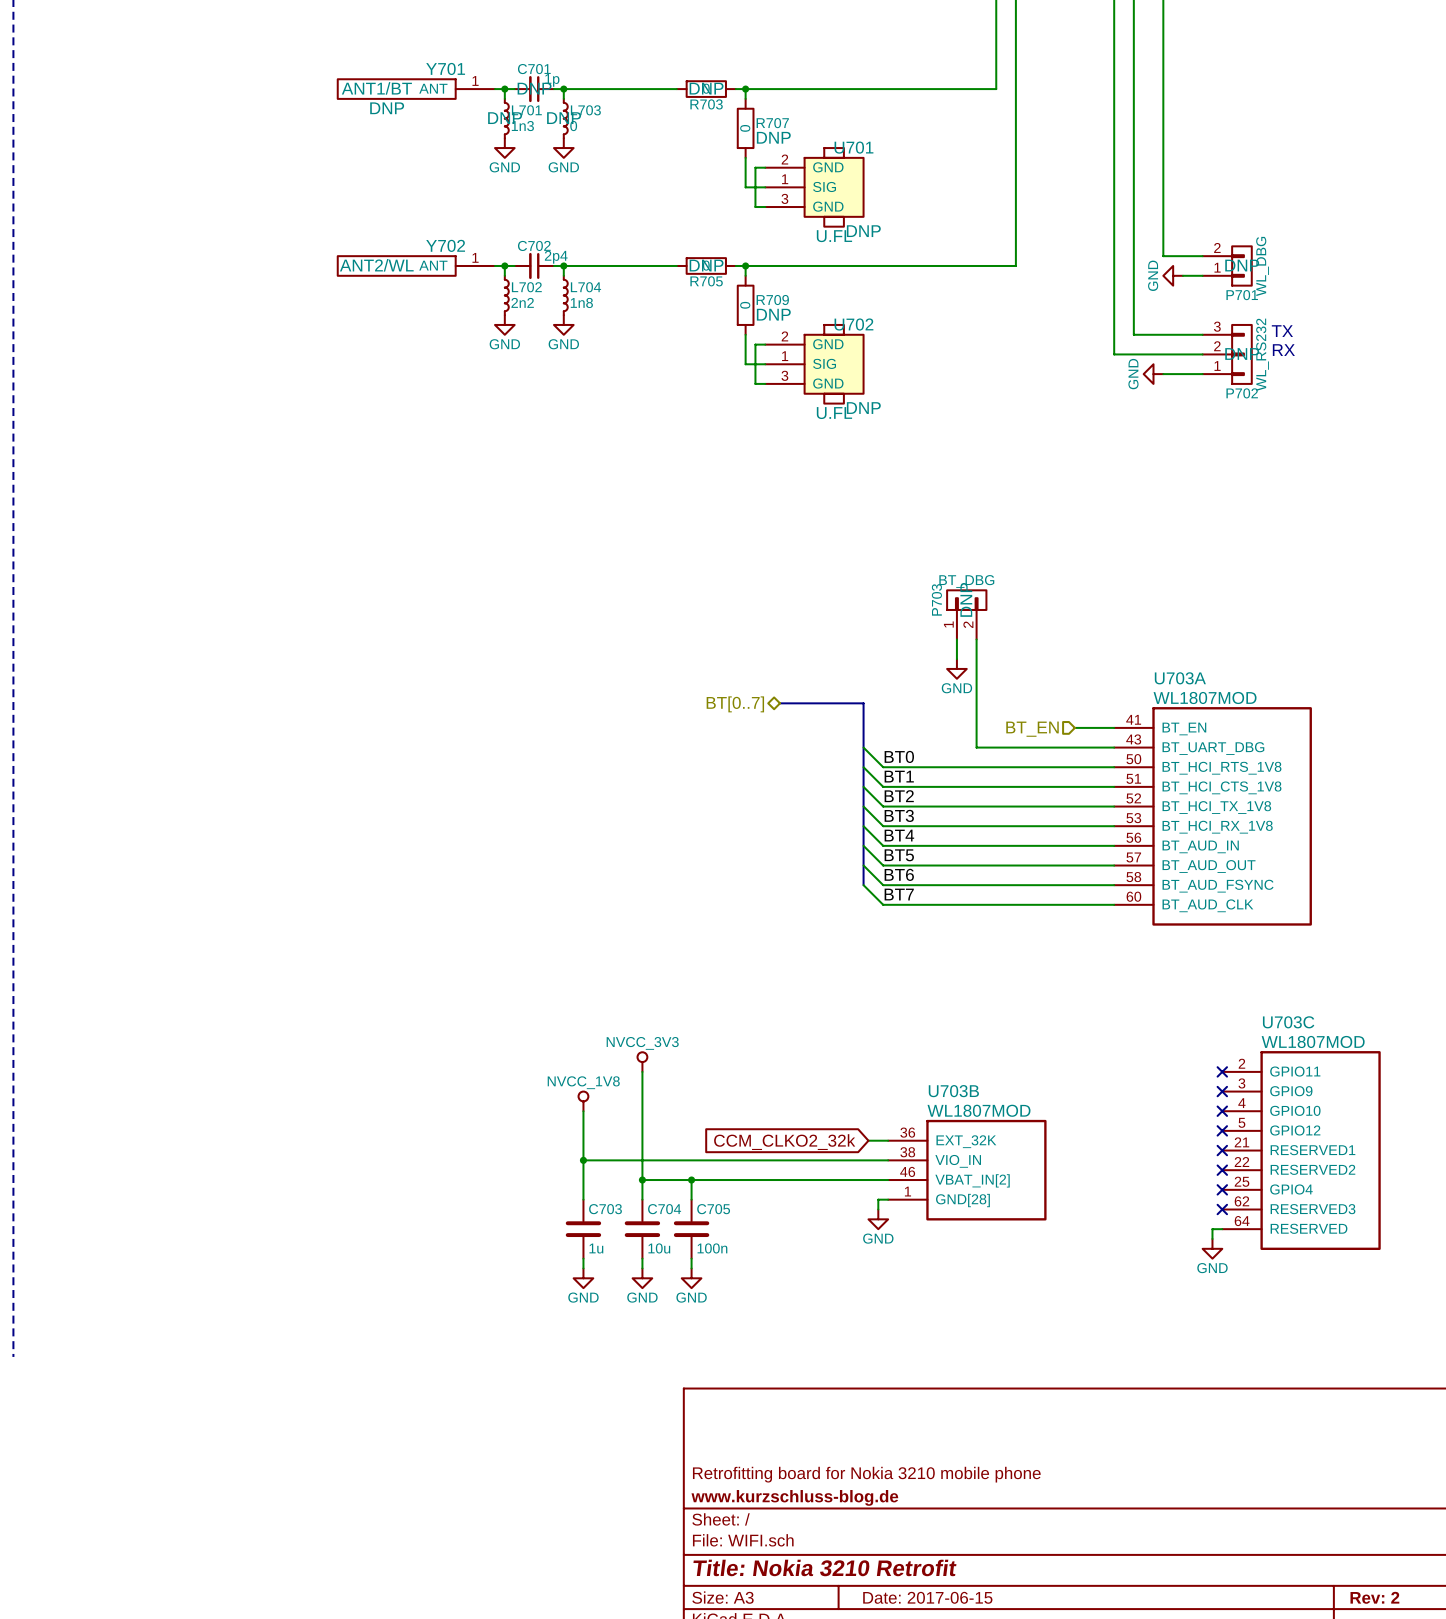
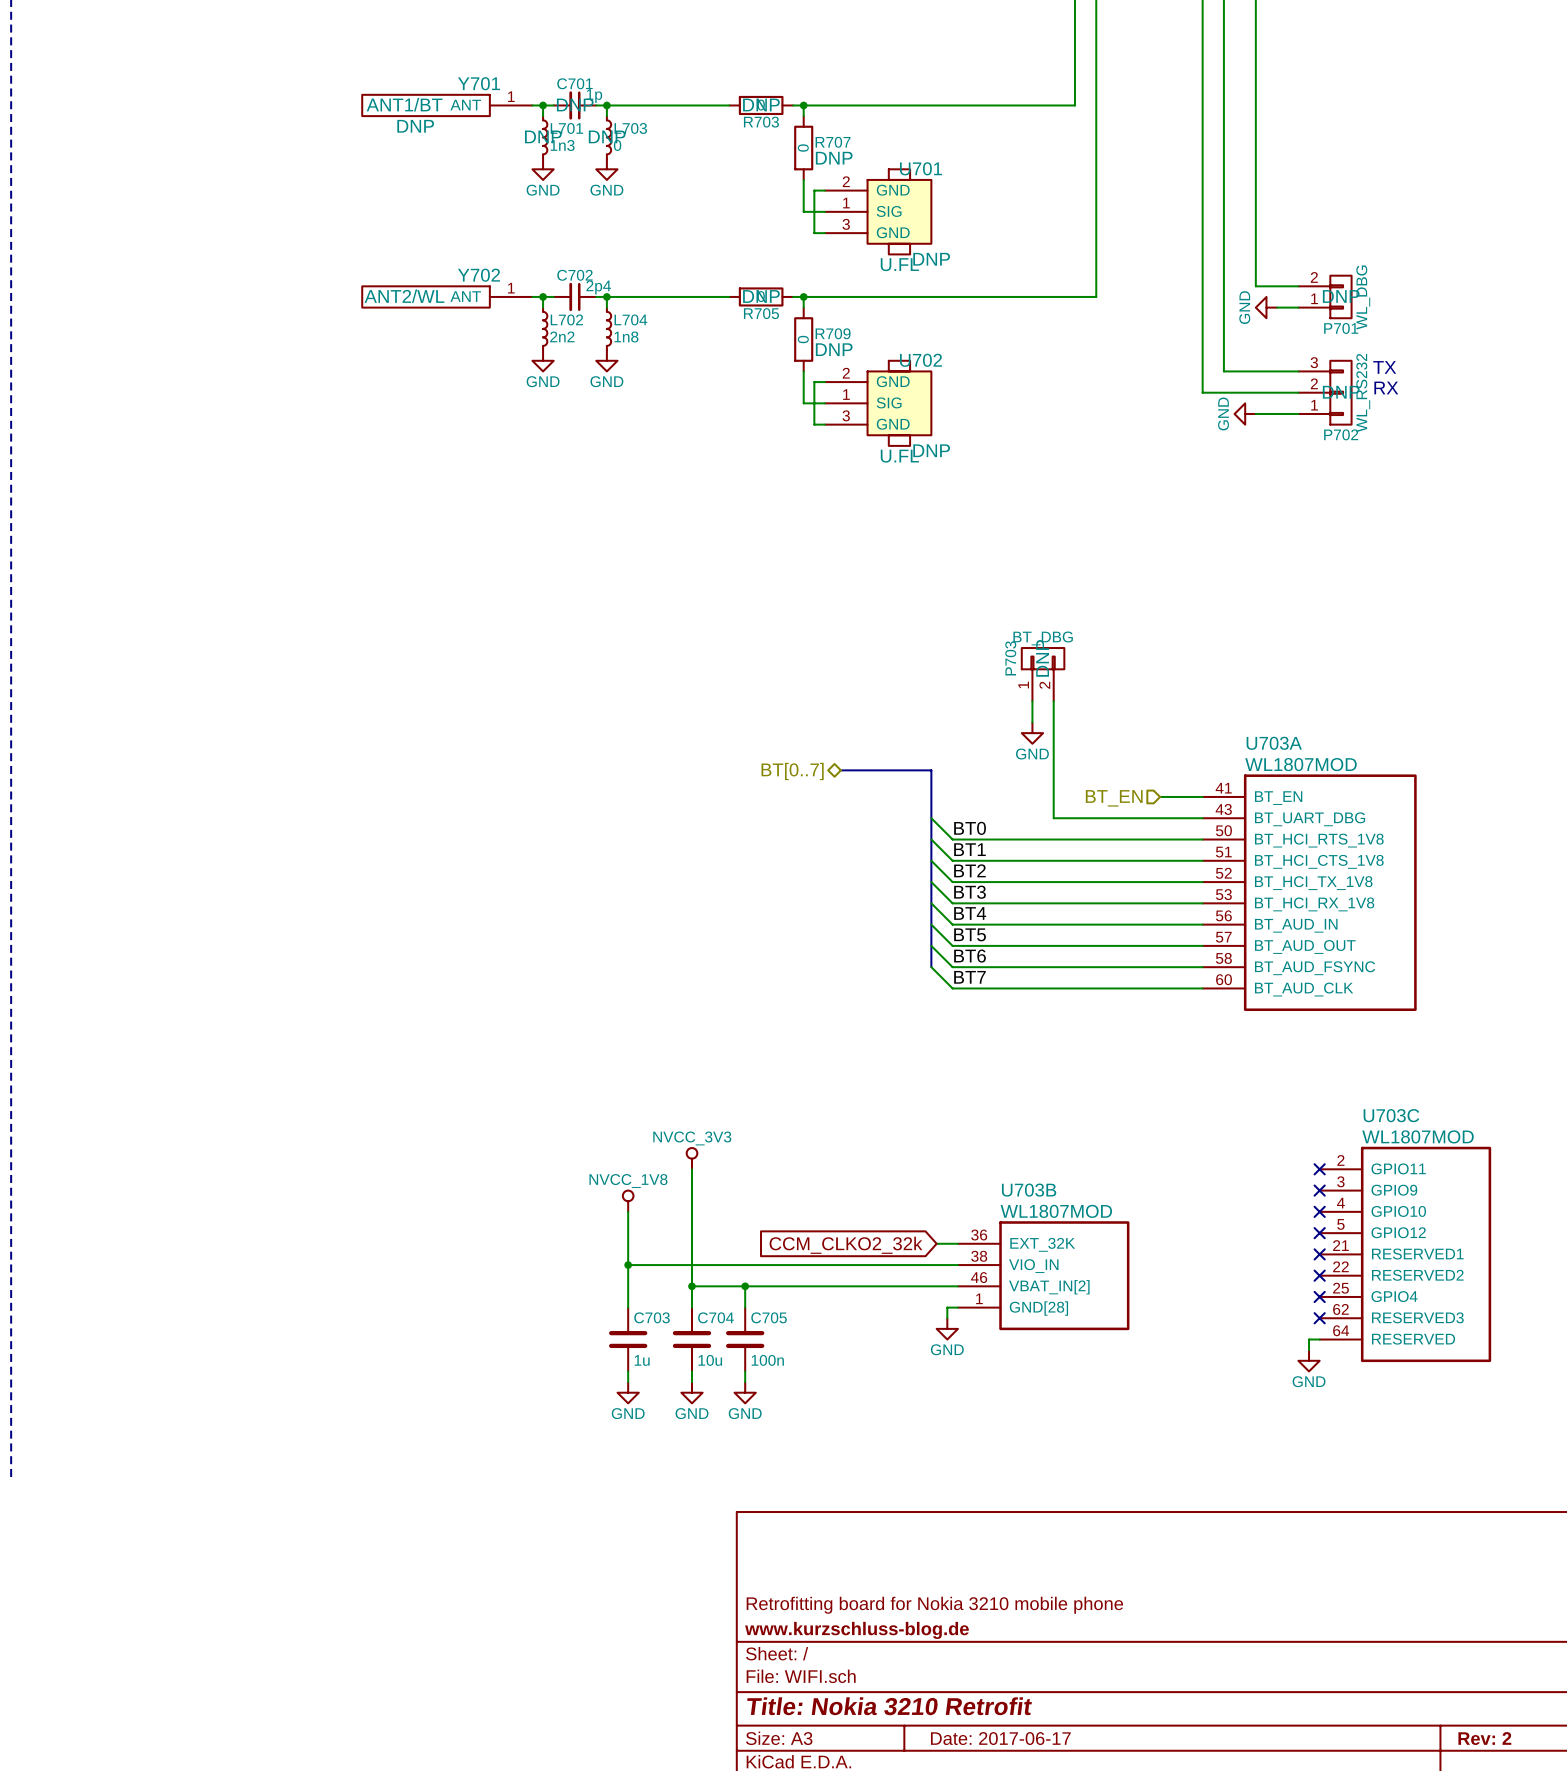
title block: Date: 2017-06-15 (927, 1597) -> Date: 2017-06-17 (1000, 1738)

